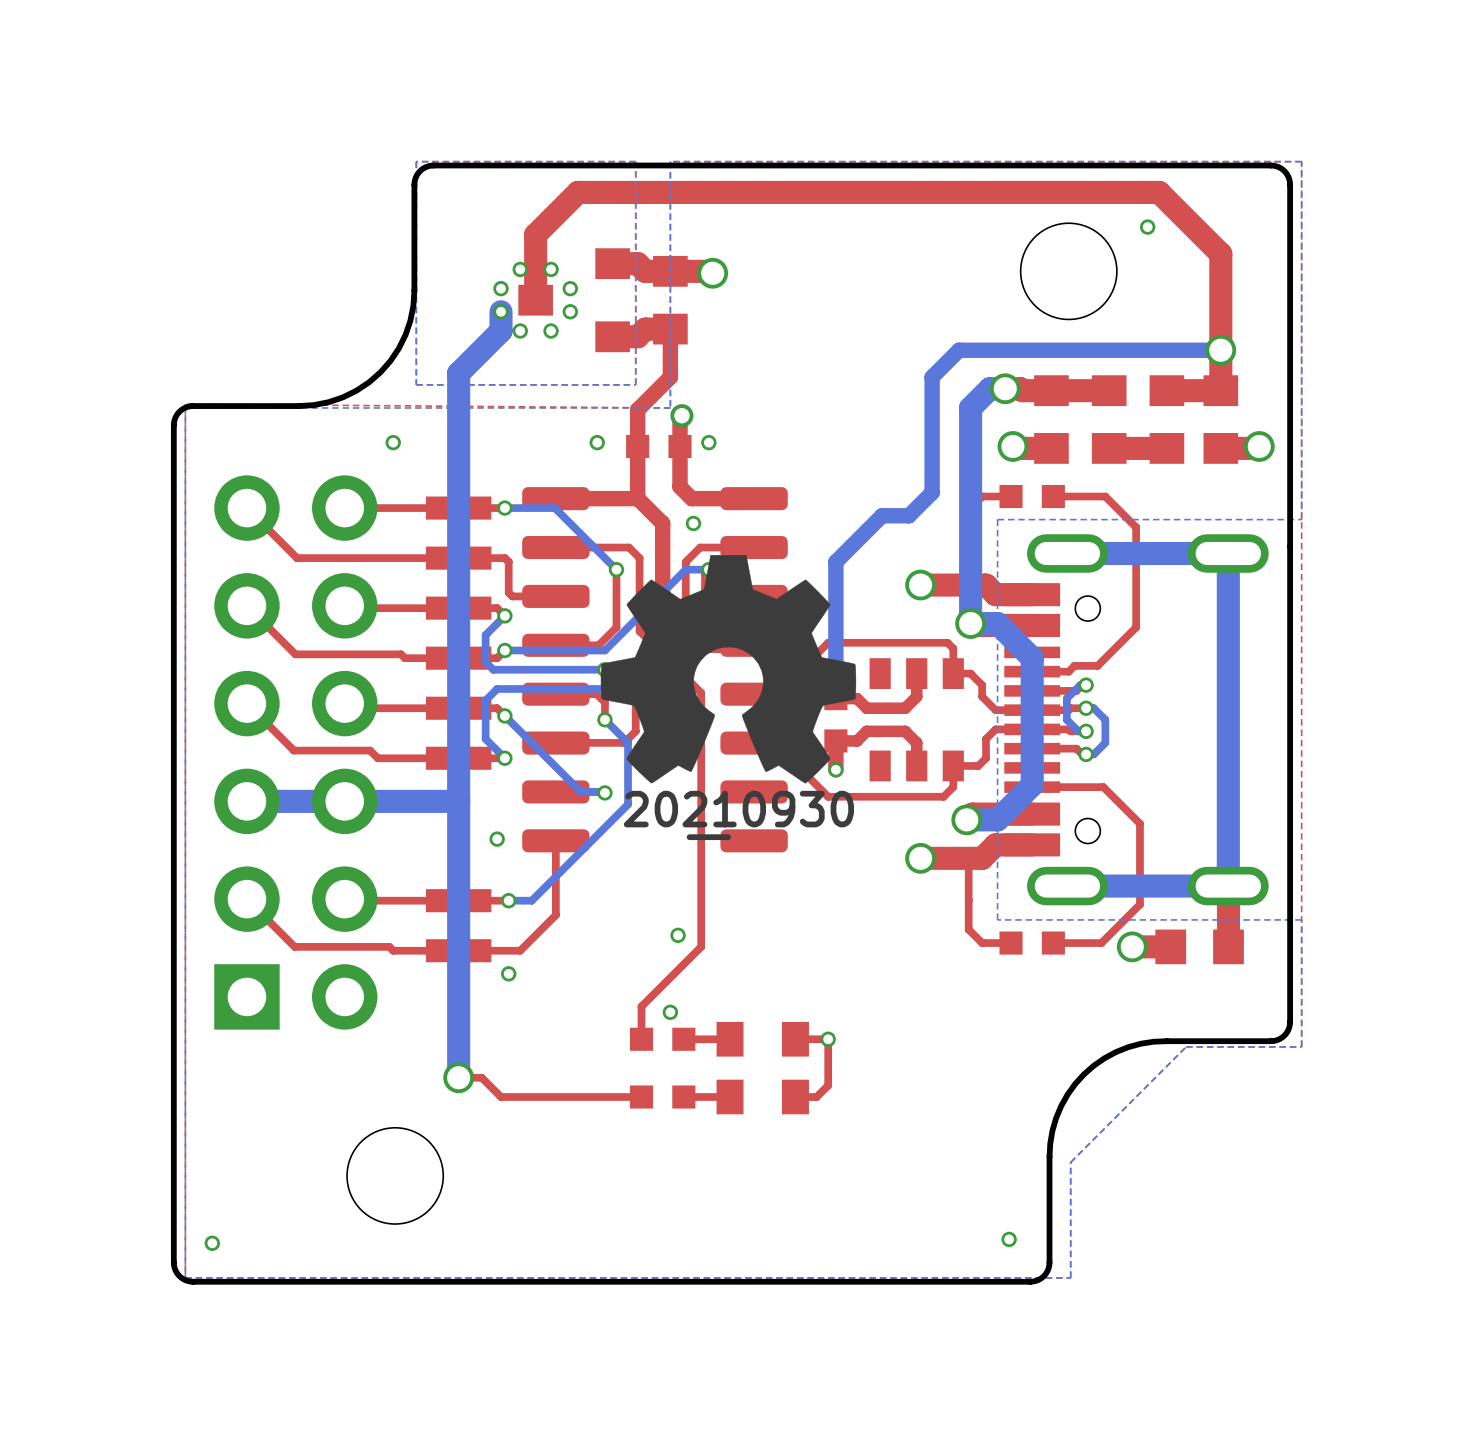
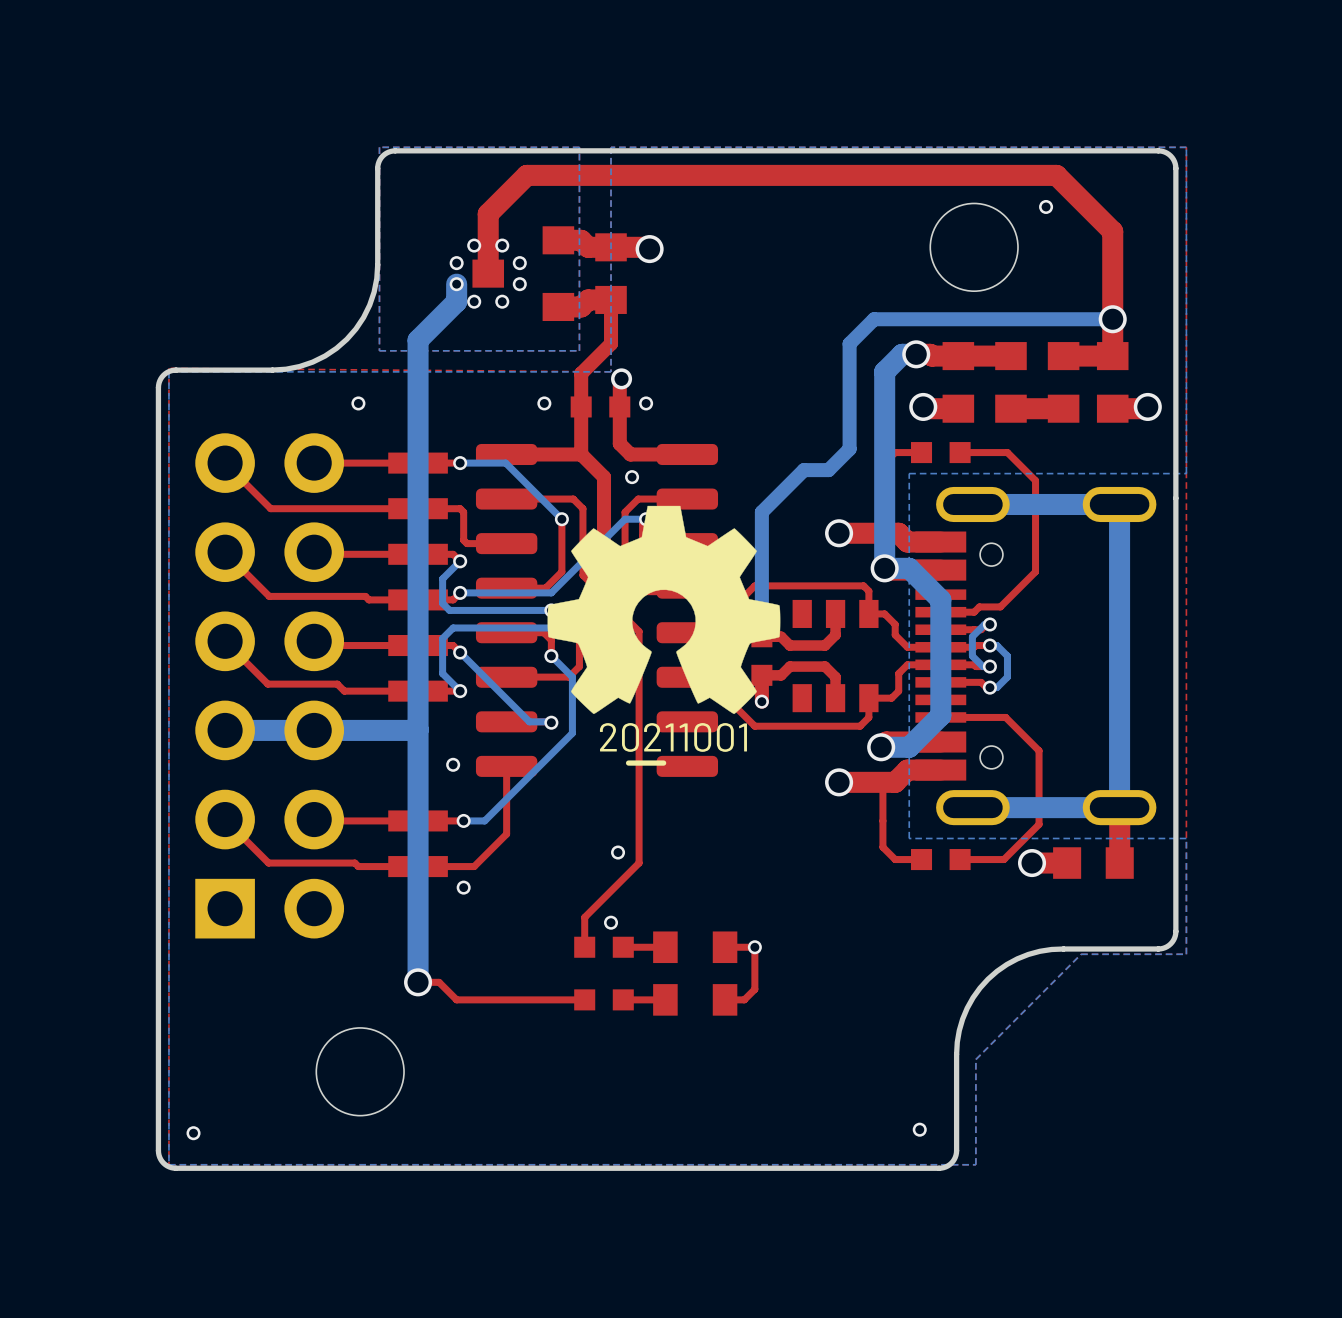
drawing shape: [623, 790, 854, 841] -> [599, 723, 747, 766]

